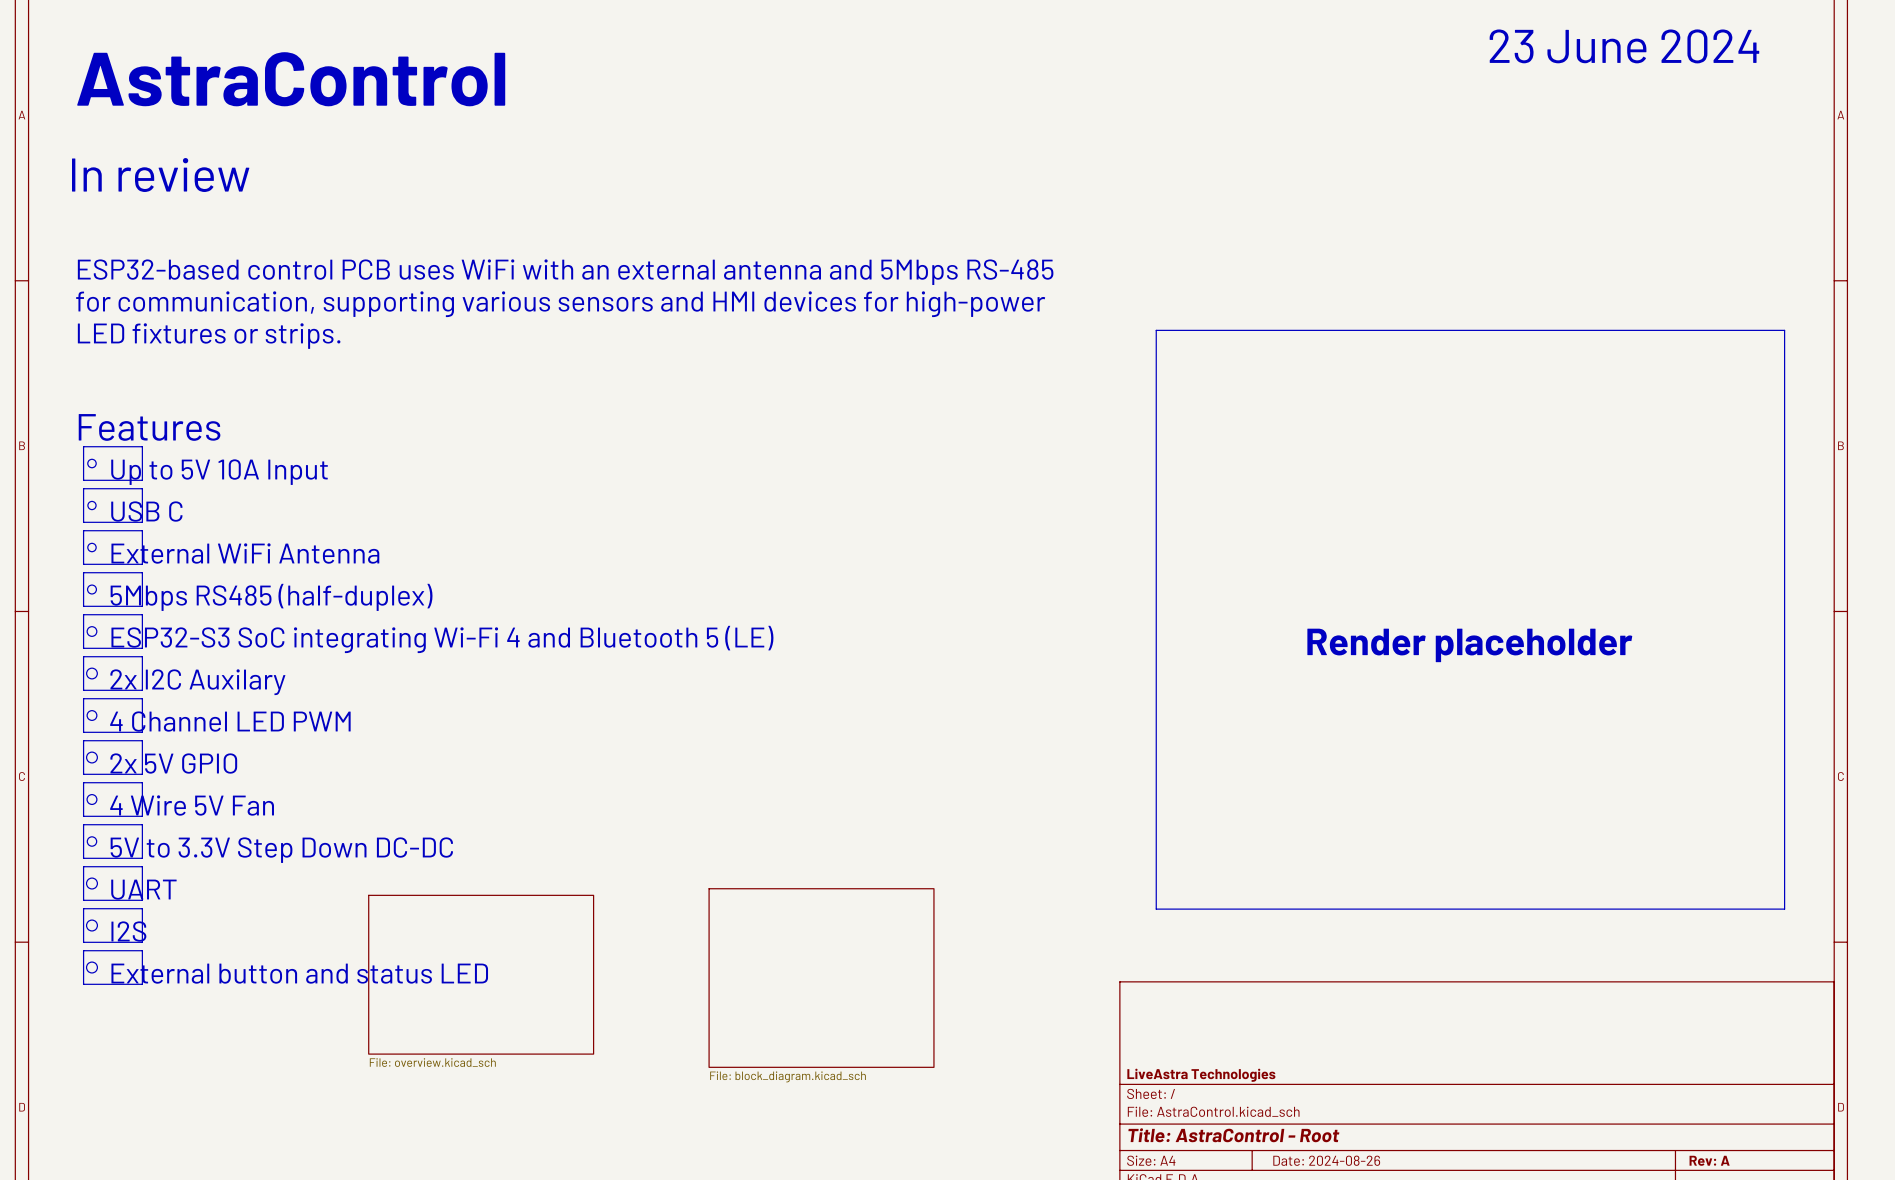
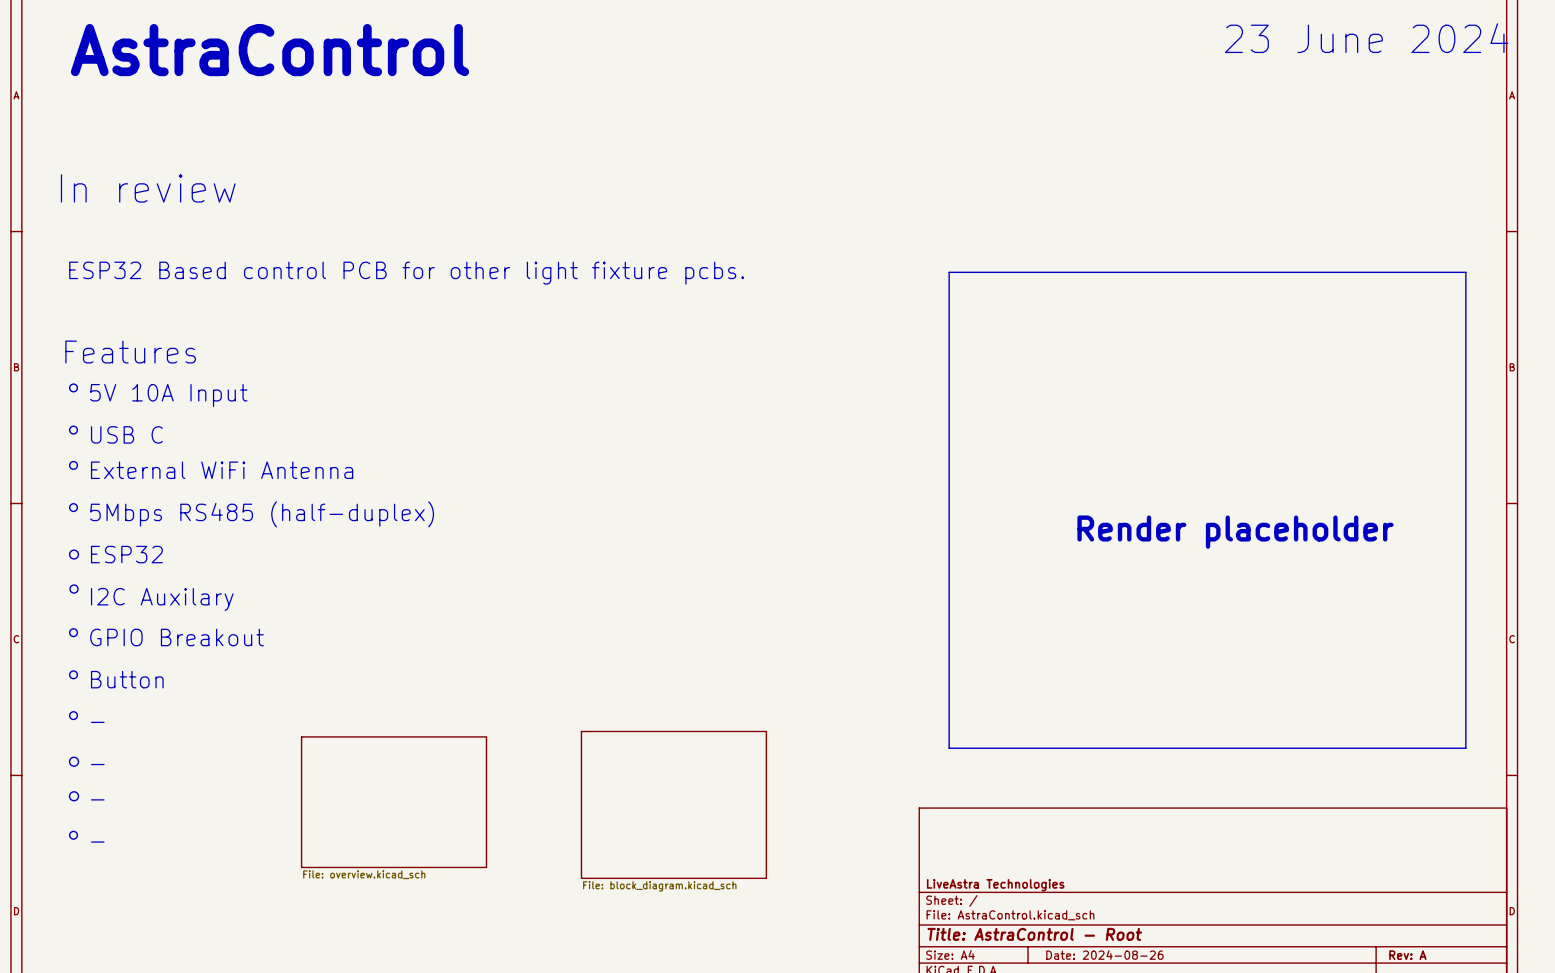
text position: AstraControl (291, 79) -> AstraControl (269, 50)
text position: In review (160, 175) -> In review (148, 188)
text: ESP32-based control PCB uses WiFi with an external antenna and 5Mbps RS-485 (565, 272) -> none
text: for communication, supporting various sensors and HMI devices for high-power (560, 304) -> none
text: none -> ESP32 Based control PCB for other light fixture pcbs. (406, 273)
text: LED fixtures or strips. (209, 336) -> none
line: (83, 446) (83, 480) (142, 480) (142, 446) (83, 446) -> none
drawing: [87, 459, 97, 468] -> none
drawing: none -> [69, 384, 78, 392]
text: Up to 5V 10A Input (219, 472) -> 5V 10A Input (168, 395)
line: (83, 488) (83, 522) (142, 522) (142, 488) (83, 488) -> none
drawing: [87, 501, 97, 510] -> none
text position: USB C (146, 511) -> USB C (126, 434)
drawing: none -> [69, 426, 78, 434]
line: (83, 530) (83, 564) (142, 564) (142, 530) (83, 530) -> none
drawing: [87, 543, 97, 552] -> none
text position: External WiFi Antenna (245, 553) -> External WiFi Antenna (222, 470)
drawing: none -> [69, 461, 78, 470]
line: (83, 572) (83, 606) (142, 606) (142, 572) (83, 572) -> none
drawing: [87, 585, 97, 594] -> none
text position: 5Mbps RS485 (half-duplex) (271, 597) -> 5Mbps RS485 (half-duplex) (262, 514)
drawing: none -> [69, 503, 78, 512]
line: (83, 614) (83, 648) (142, 648) (142, 614) (83, 614) -> none
drawing: [87, 626, 97, 637] -> none
text: ESP32-S3 SoC integrating Wi-Fi 4 and Bluetooth 5 (LE) (442, 639) -> none
line: (83, 656) (83, 690) (142, 690) (142, 656) (83, 656) -> none
text: 2x I2C Auxilary (197, 682) -> ESP32 (126, 554)
line: (83, 698) (142, 698) (142, 732) (83, 732) (83, 698) -> none
text: 4 Channel LED PWM (230, 721) -> I2C Auxilary (162, 599)
line: (83, 740) (83, 774) (142, 774) (142, 740) (83, 740) -> none
drawing: [86, 752, 98, 763] -> none
drawing: none -> [69, 628, 78, 637]
text: 2x 5V GPIO (173, 763) -> none
text: none -> GPIO Breakout (177, 637)
line: (83, 782) (83, 816) (142, 816) (142, 782) (83, 782) -> none
drawing: [87, 794, 97, 805] -> none
text: 4 Wire 5V Fan (192, 805) -> none
drawing: none -> [69, 670, 78, 679]
line: (83, 824) (83, 858) (142, 858) (142, 824) (83, 824) -> none
text: none -> Button (127, 679)
drawing: [87, 836, 97, 847] -> none
text: 5V to 3.3V Step Down DC-DC (281, 850) -> none
drawing: none -> [69, 711, 78, 720]
line: (83, 866) (83, 900) (142, 900) (142, 866) (83, 866) -> none
text: none -> - (97, 722)
drawing: [86, 878, 98, 889] -> none
text: UART (143, 889) -> none
line: (83, 908) (83, 942) (142, 942) (142, 908) (83, 908) -> none
text: I2S (128, 931) -> - (97, 764)
line: (83, 950) (83, 984) (142, 984) (142, 950) (83, 950) -> none
text: External button and status LED (299, 973) -> - (97, 799)
drawing: none -> [69, 831, 78, 840]
text: none -> - (97, 842)

